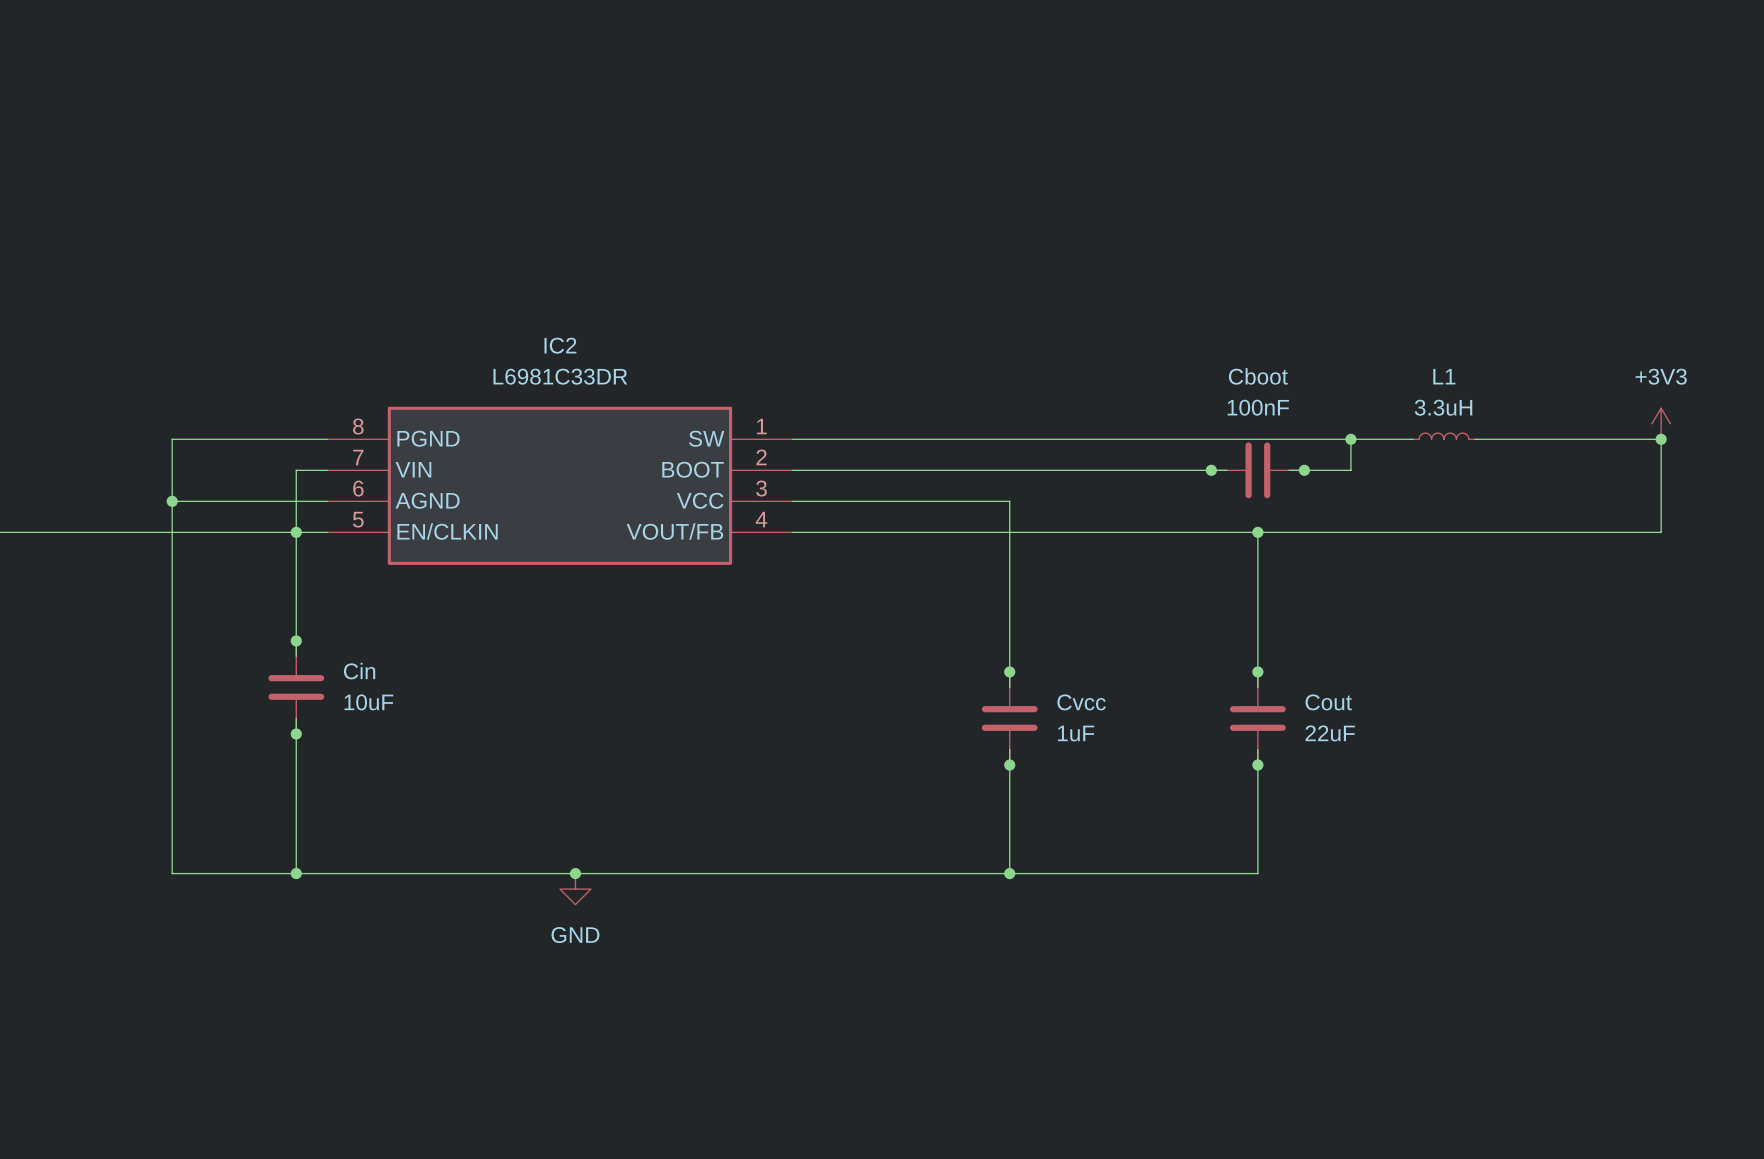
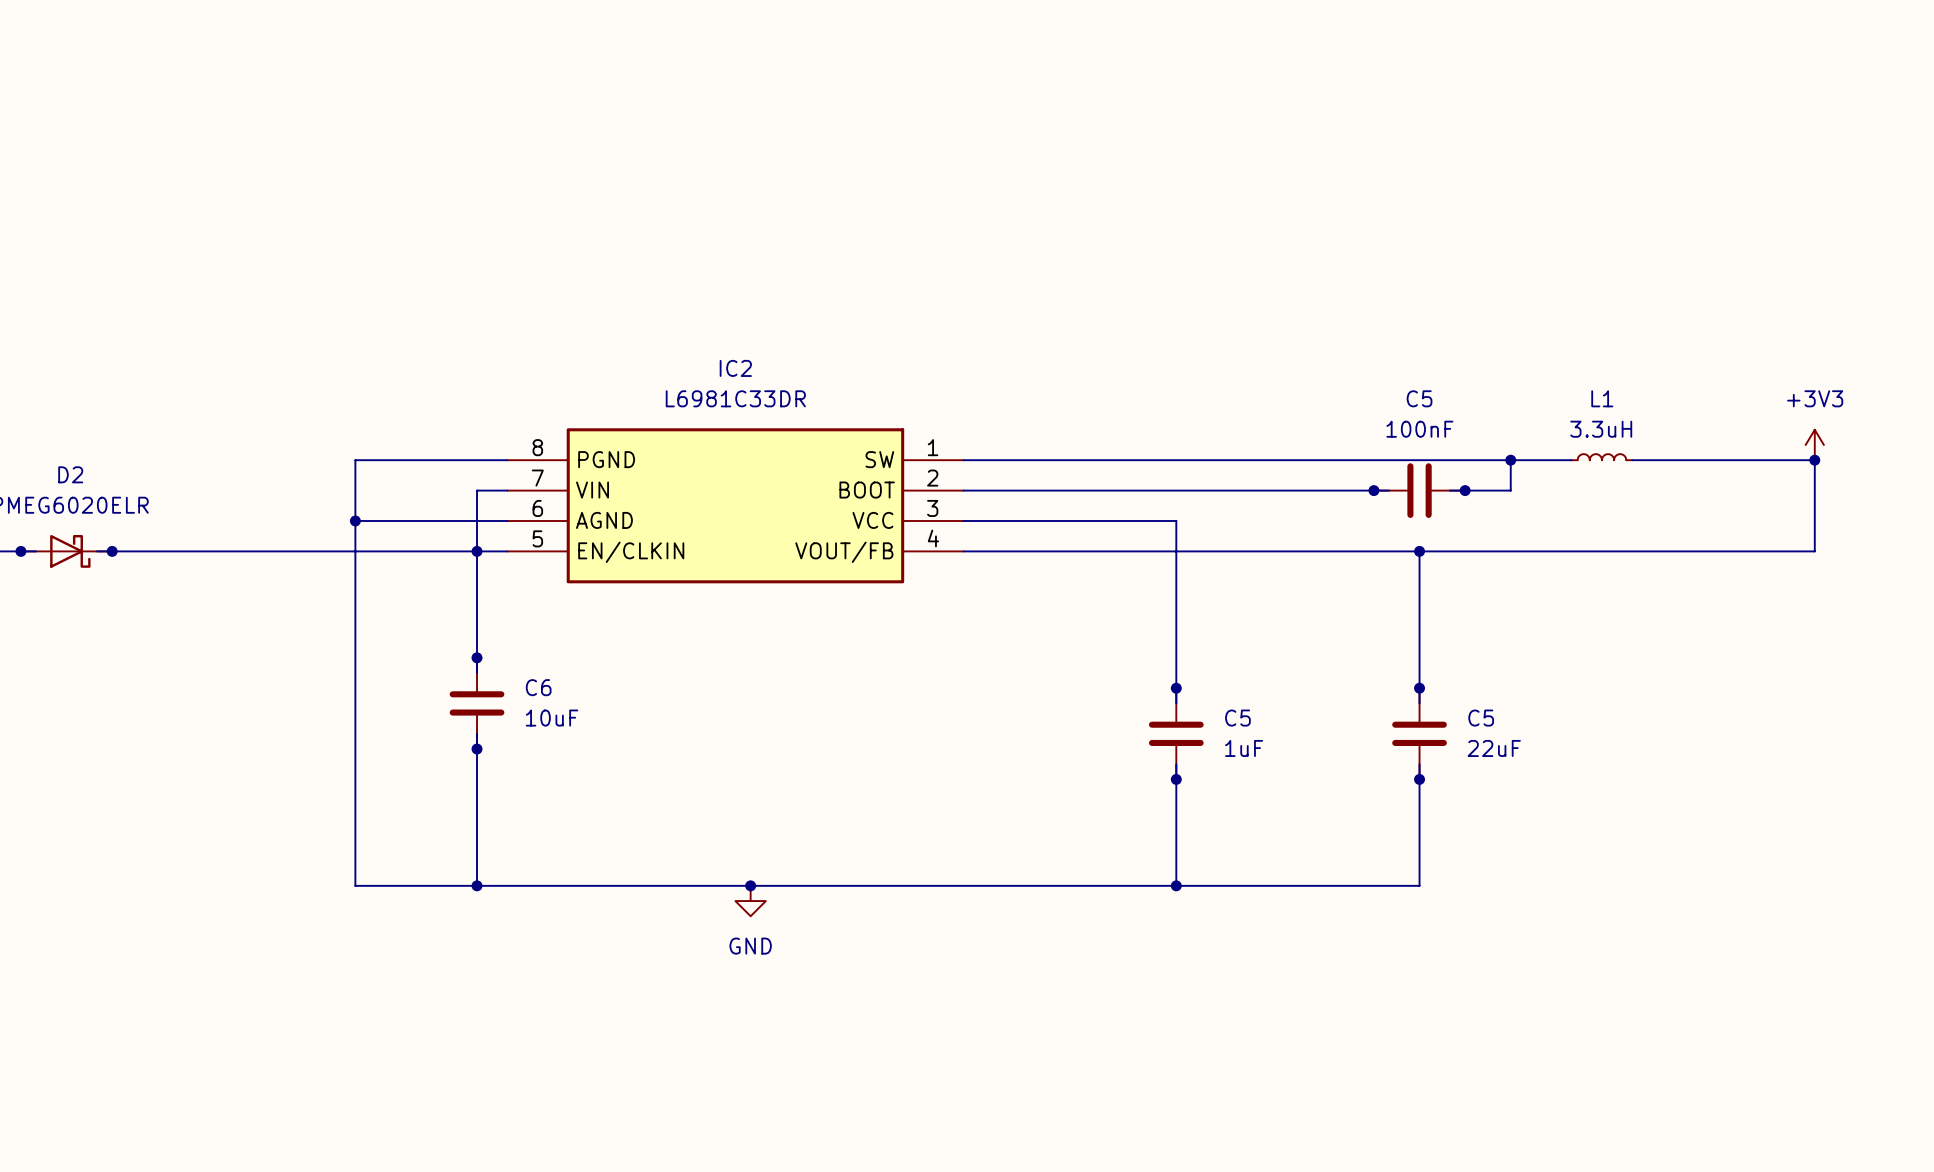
Cboot name: Cboot (1258, 376) -> C5 (1419, 398)
Cin name: Cin (359, 671) -> C6 (538, 687)
Cvcc name: Cvcc (1081, 702) -> C5 (1237, 718)
Cout name: Cout (1328, 702) -> C5 (1481, 718)

